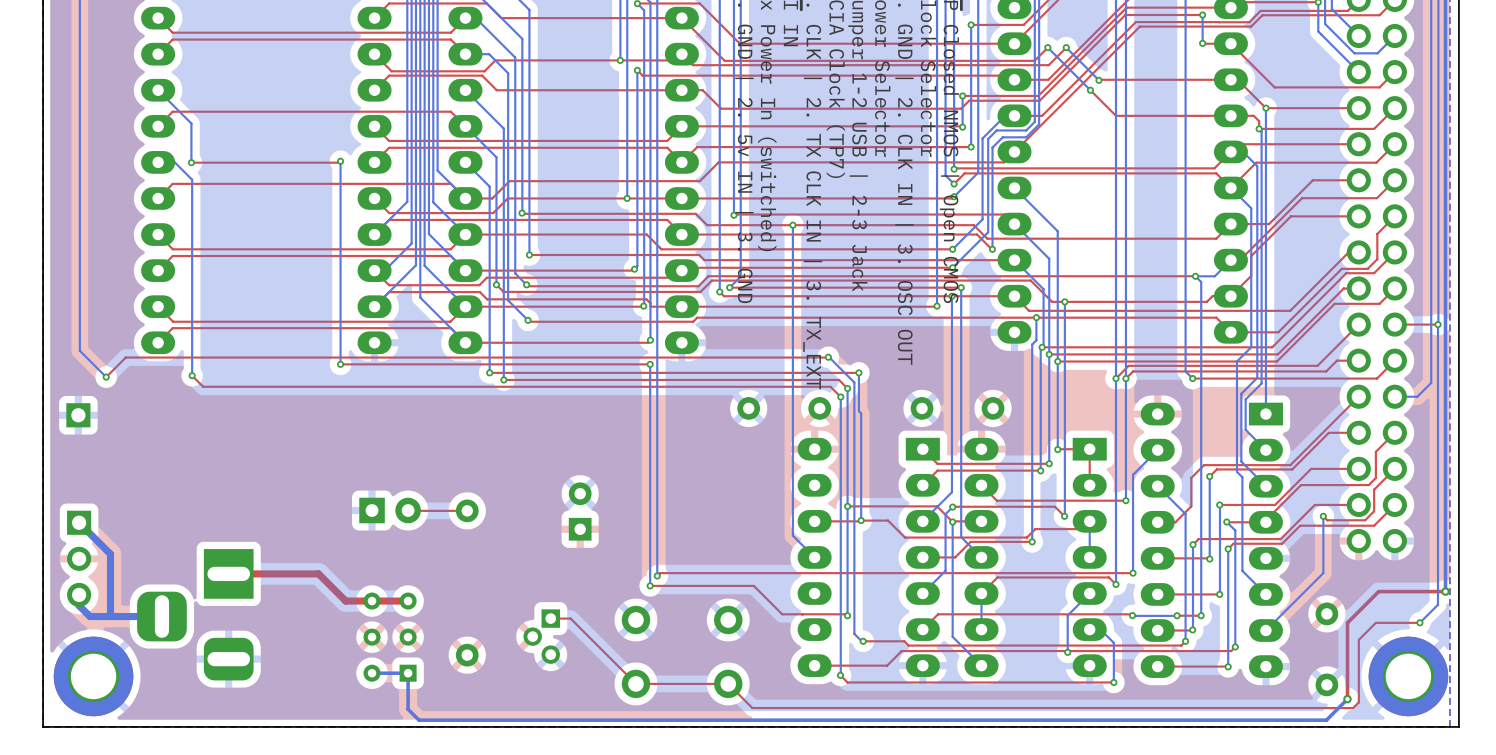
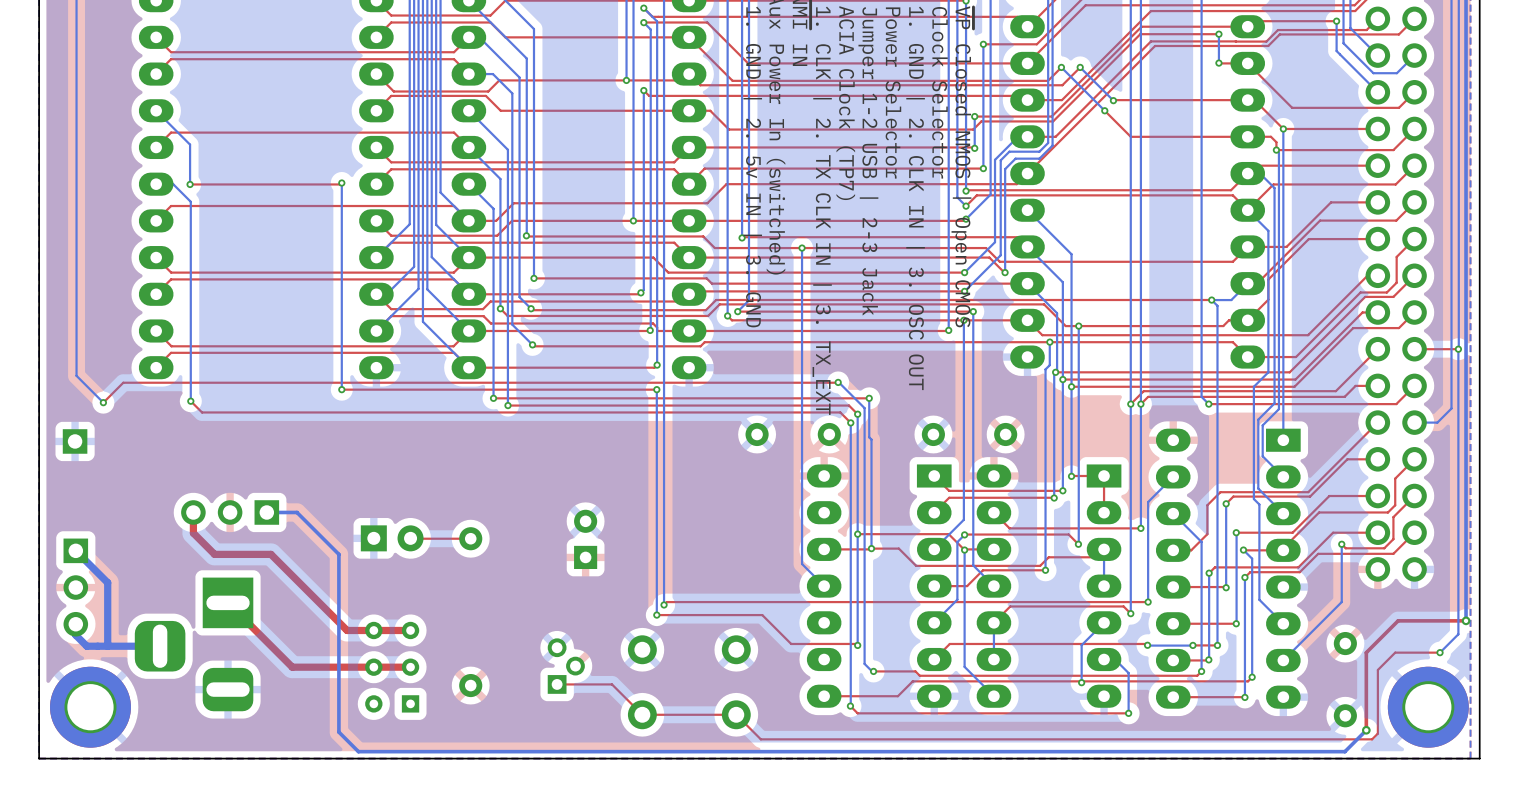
part: none -> (230, 512)
top track: none -> (228, 602) (292, 667) (410, 667)
top track: (318, 573) (228, 573) -> (319, 602) (271, 554) (214, 554) (193, 533) (193, 512)
top track: (550, 618) (570, 618) (606, 654) -> (557, 684) (612, 684)
part rotation: 0° (541, 636) -> 180° (566, 666)
bottom track: (372, 673) (408, 673) (408, 709) (418, 720) -> (266, 512) (297, 512) (338, 554) (338, 732) (358, 751) (421, 751)

